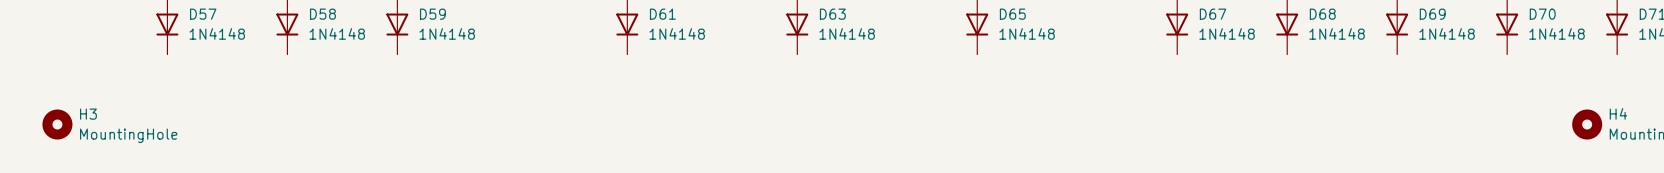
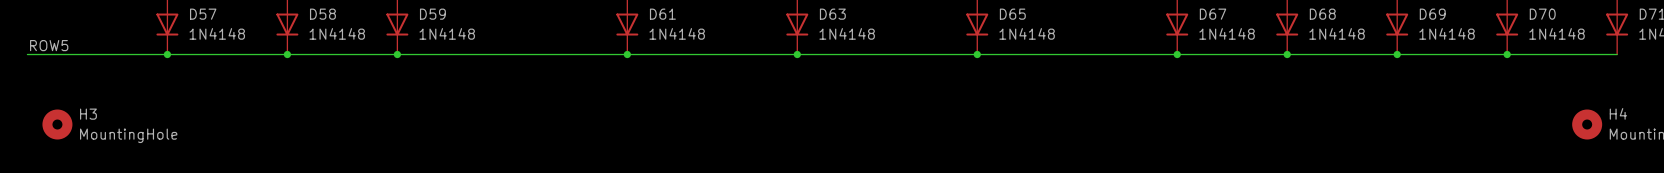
label: none -> ROW5 (49, 45)
wire: none -> (27, 54) (1617, 54)
junction: none -> (167, 54)
junction: none -> (287, 54)
junction: none -> (397, 54)
junction: none -> (627, 54)
junction: none -> (797, 54)
junction: none -> (977, 54)
junction: none -> (1177, 54)
junction: none -> (1287, 54)
junction: none -> (1397, 54)
junction: none -> (1507, 54)

